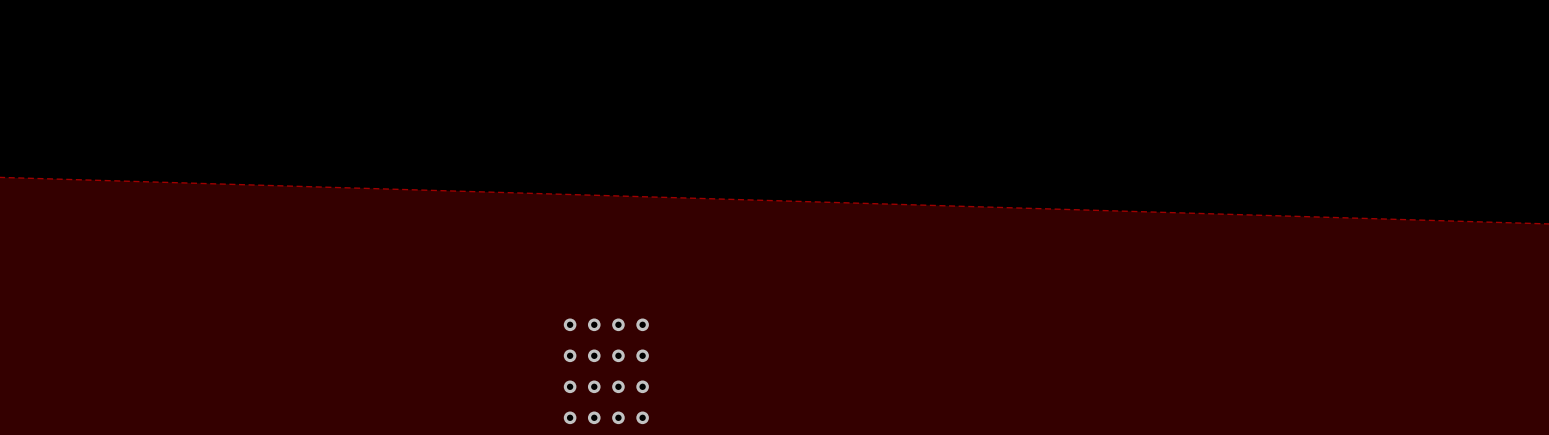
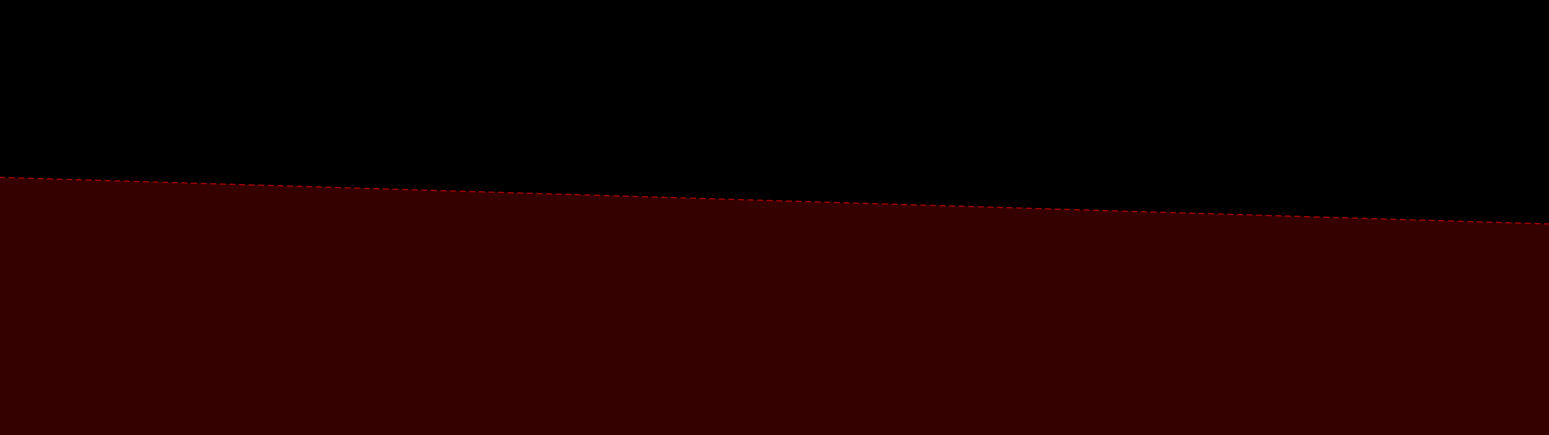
via: (570, 324) -> none
via: (594, 324) -> none
via: (618, 324) -> none
via: (642, 324) -> none
via: (570, 355) -> none
via: (594, 355) -> none
via: (618, 355) -> none
via: (642, 355) -> none
via: (570, 386) -> none
via: (594, 386) -> none
via: (618, 386) -> none
via: (642, 386) -> none
via: (570, 417) -> none
via: (594, 417) -> none
via: (618, 417) -> none
via: (642, 417) -> none

